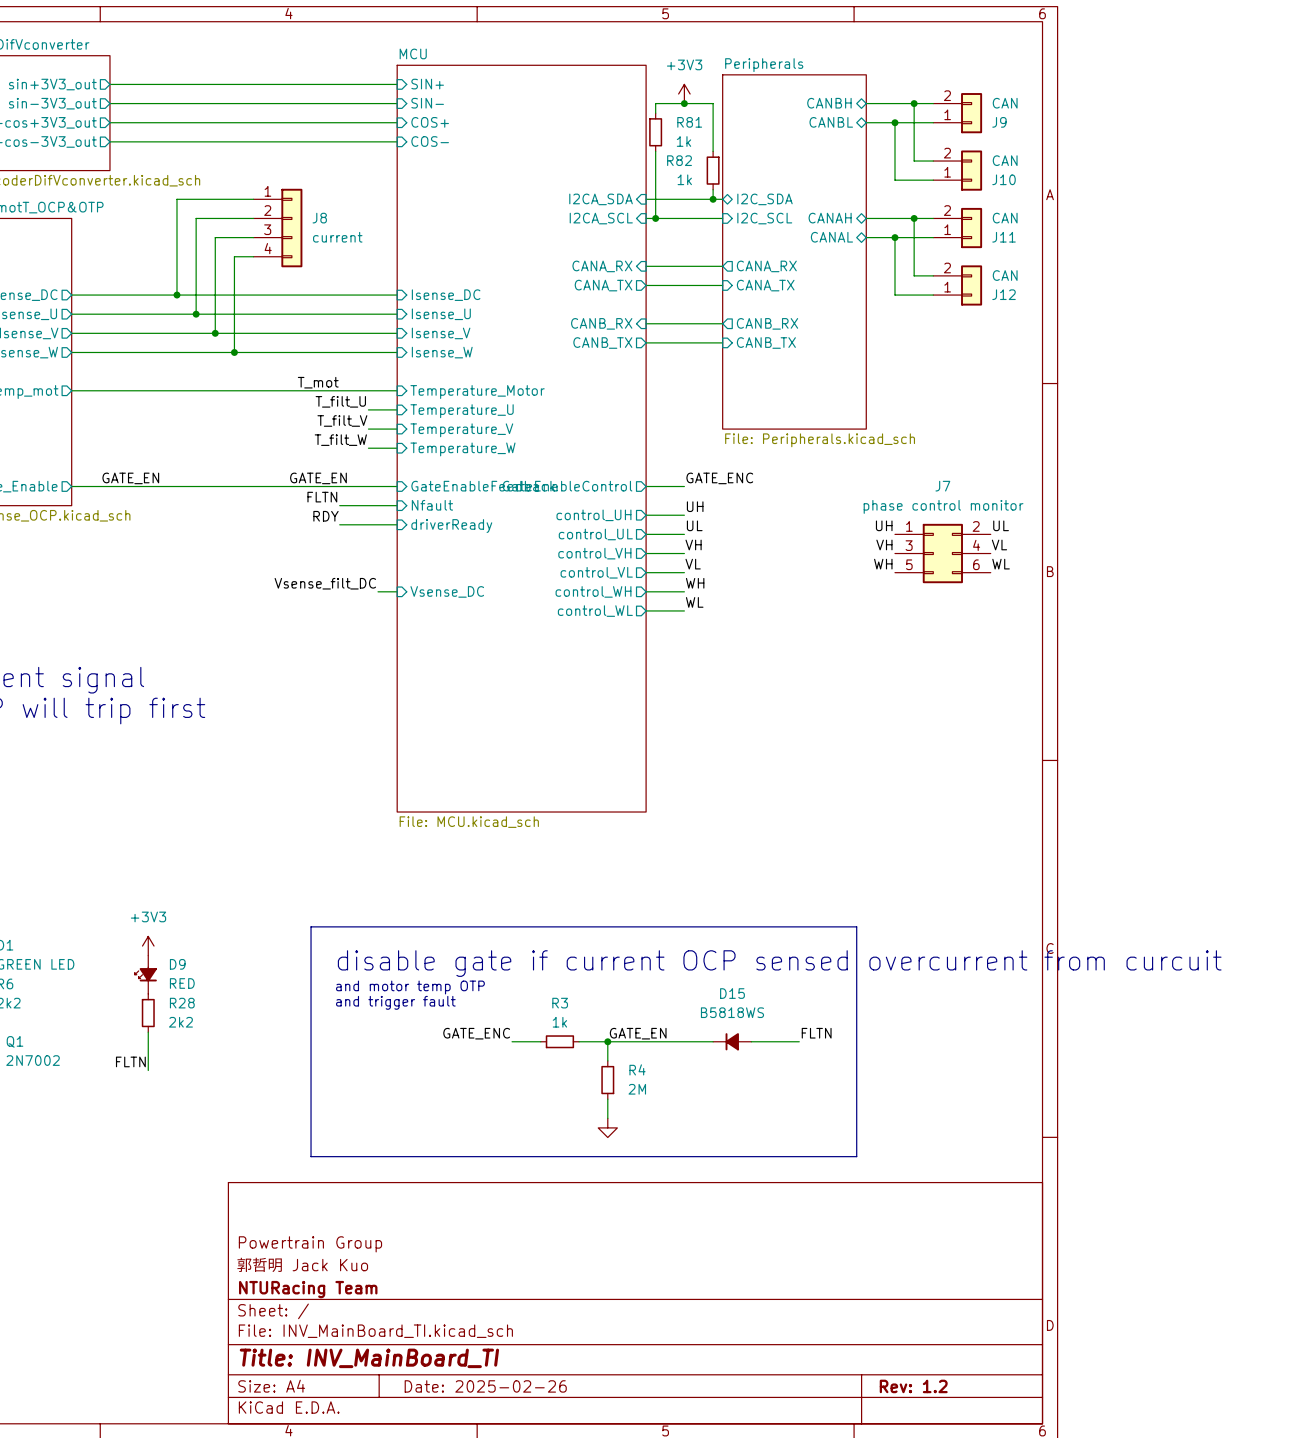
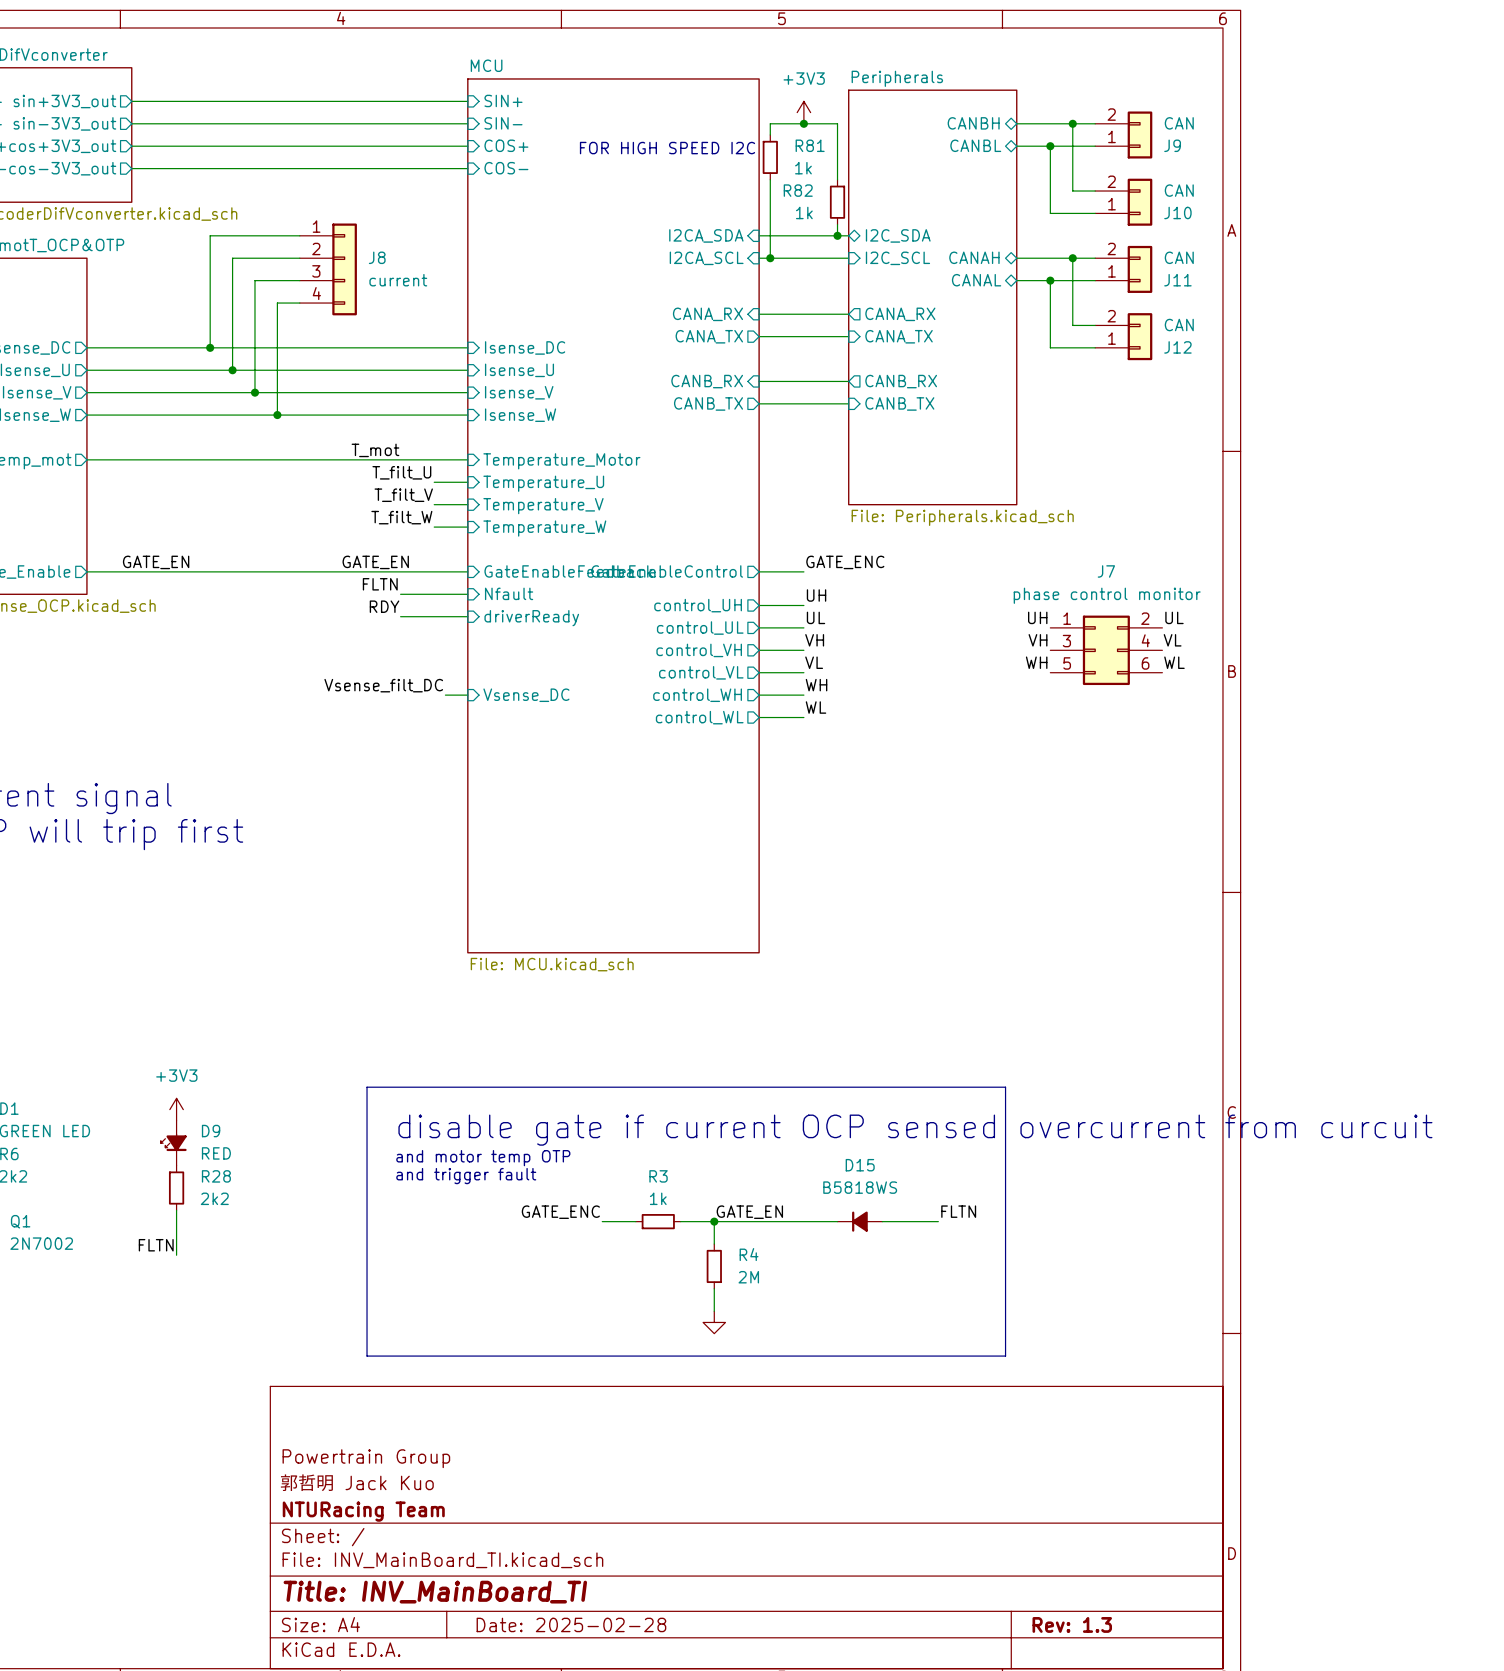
text: none -> FOR HIGH SPEED I2C (667, 148)
title block: Date: 2025-02-26 (485, 1386) -> Date: 2025-02-28 (571, 1624)
title block: Rev: 1.2 (913, 1386) -> Rev: 1.3 (1072, 1624)

